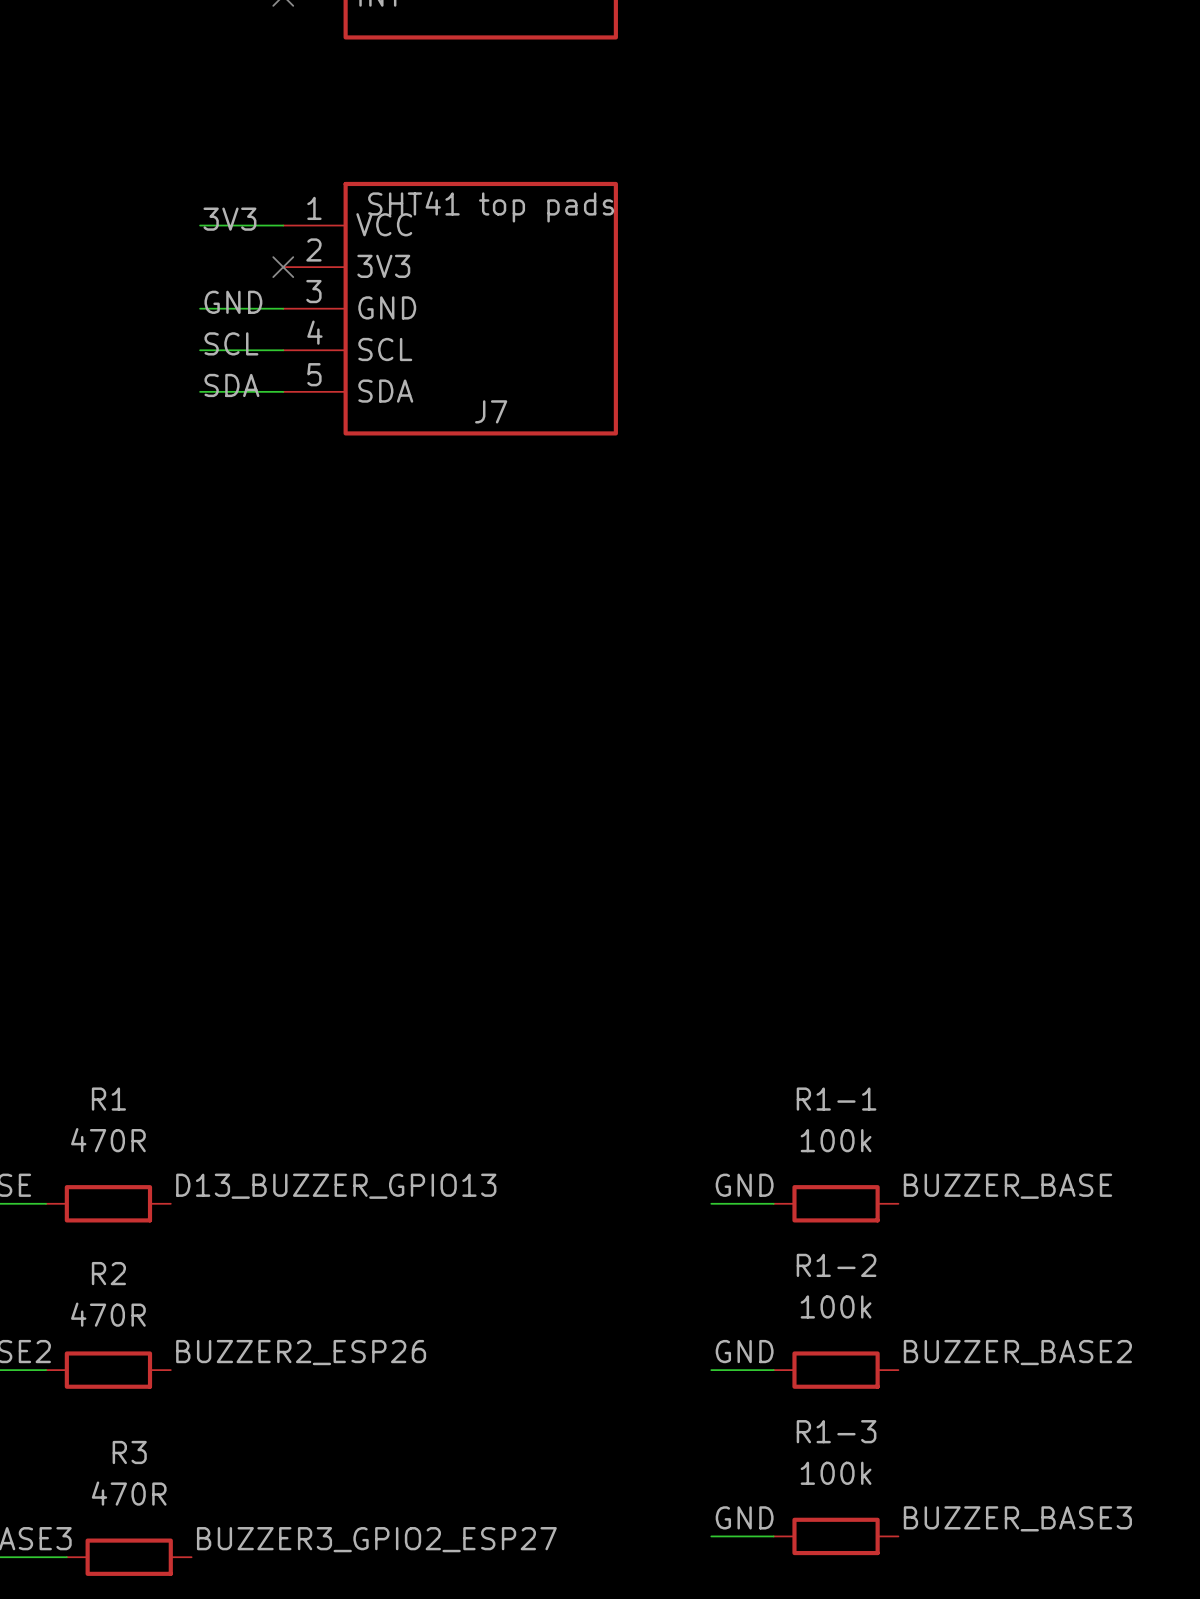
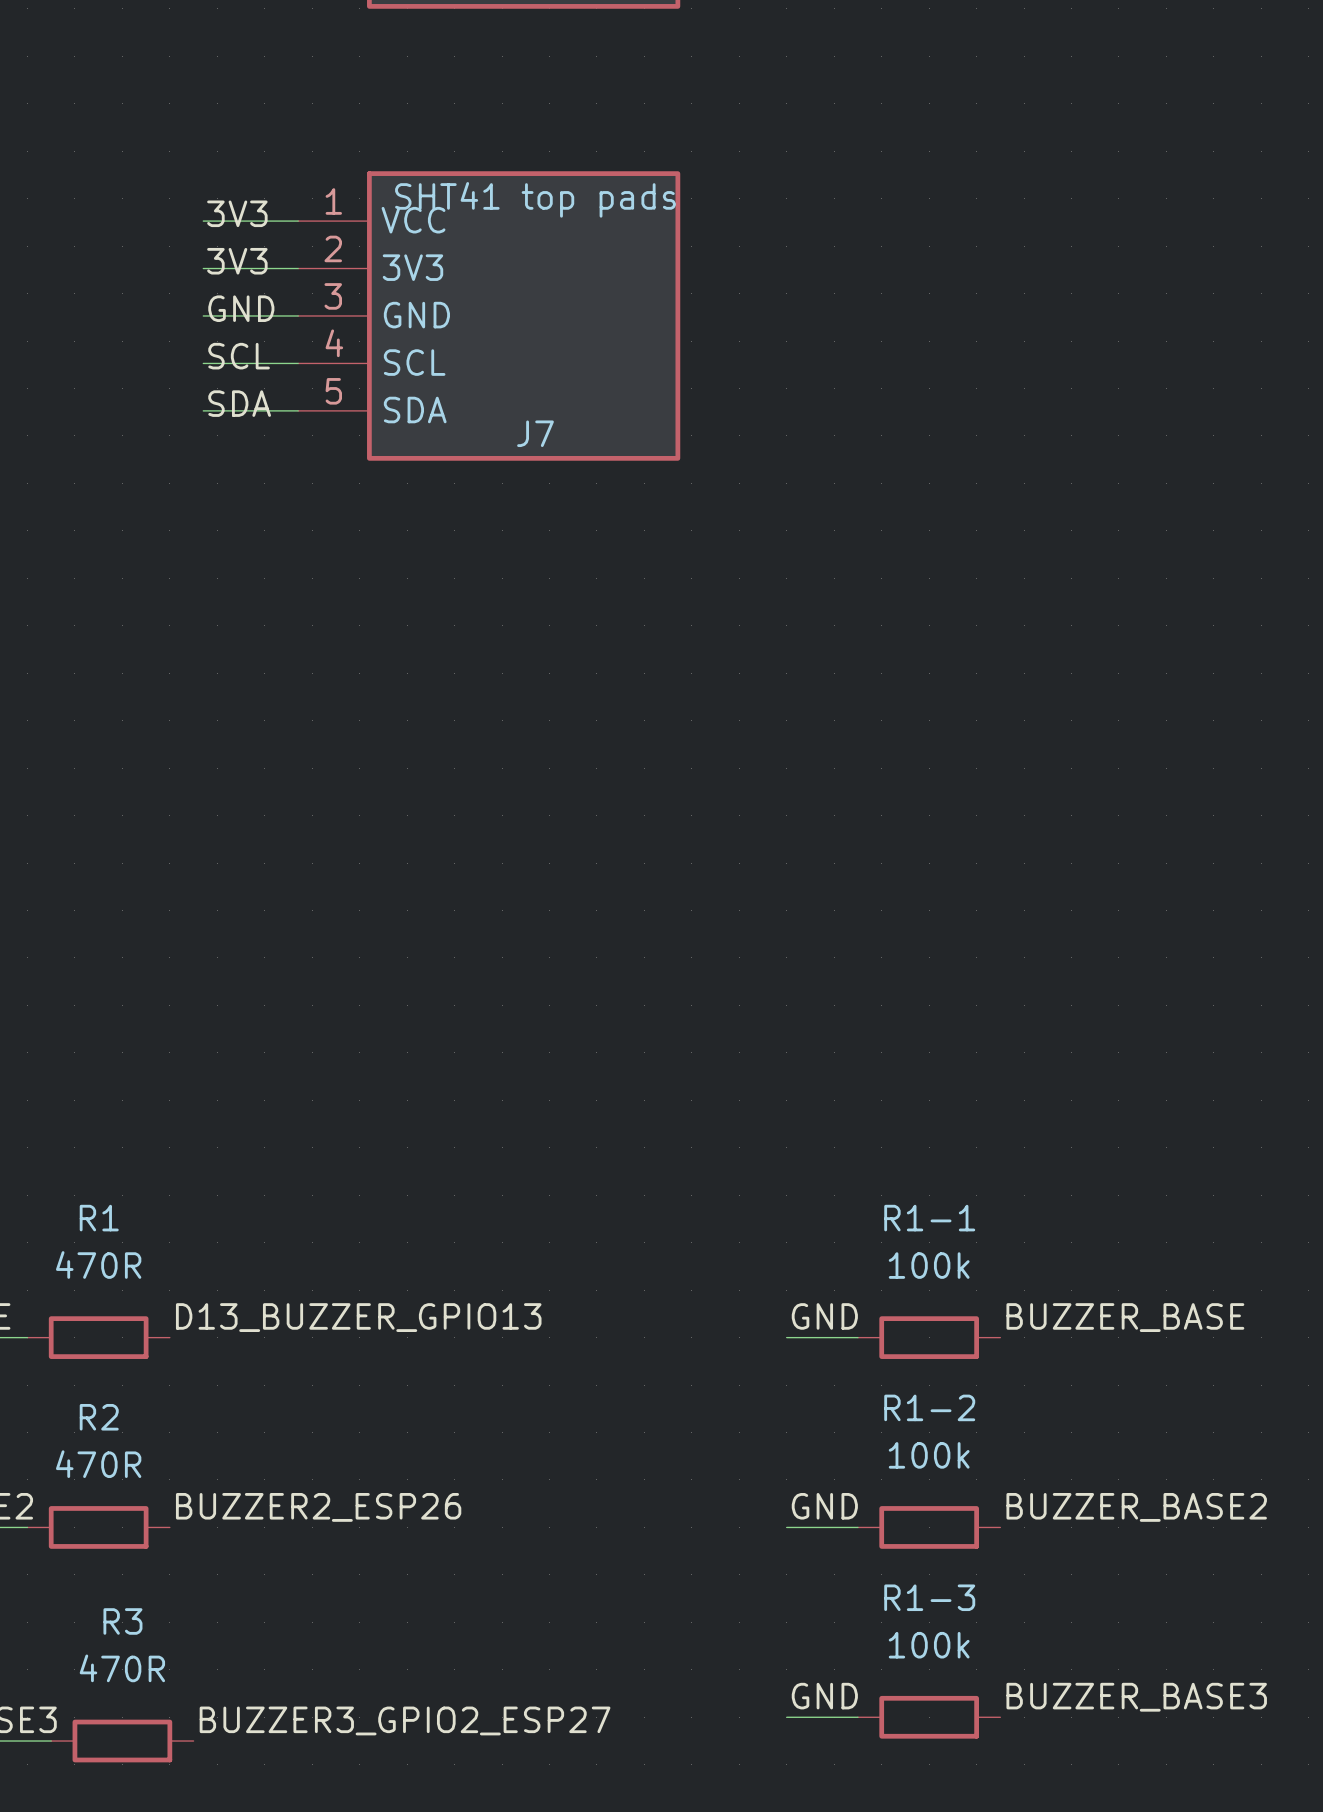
label: none -> 3V3 (237, 261)
wire: none -> (203, 268) (298, 268)
no-connect mark: (283, 267) -> none

